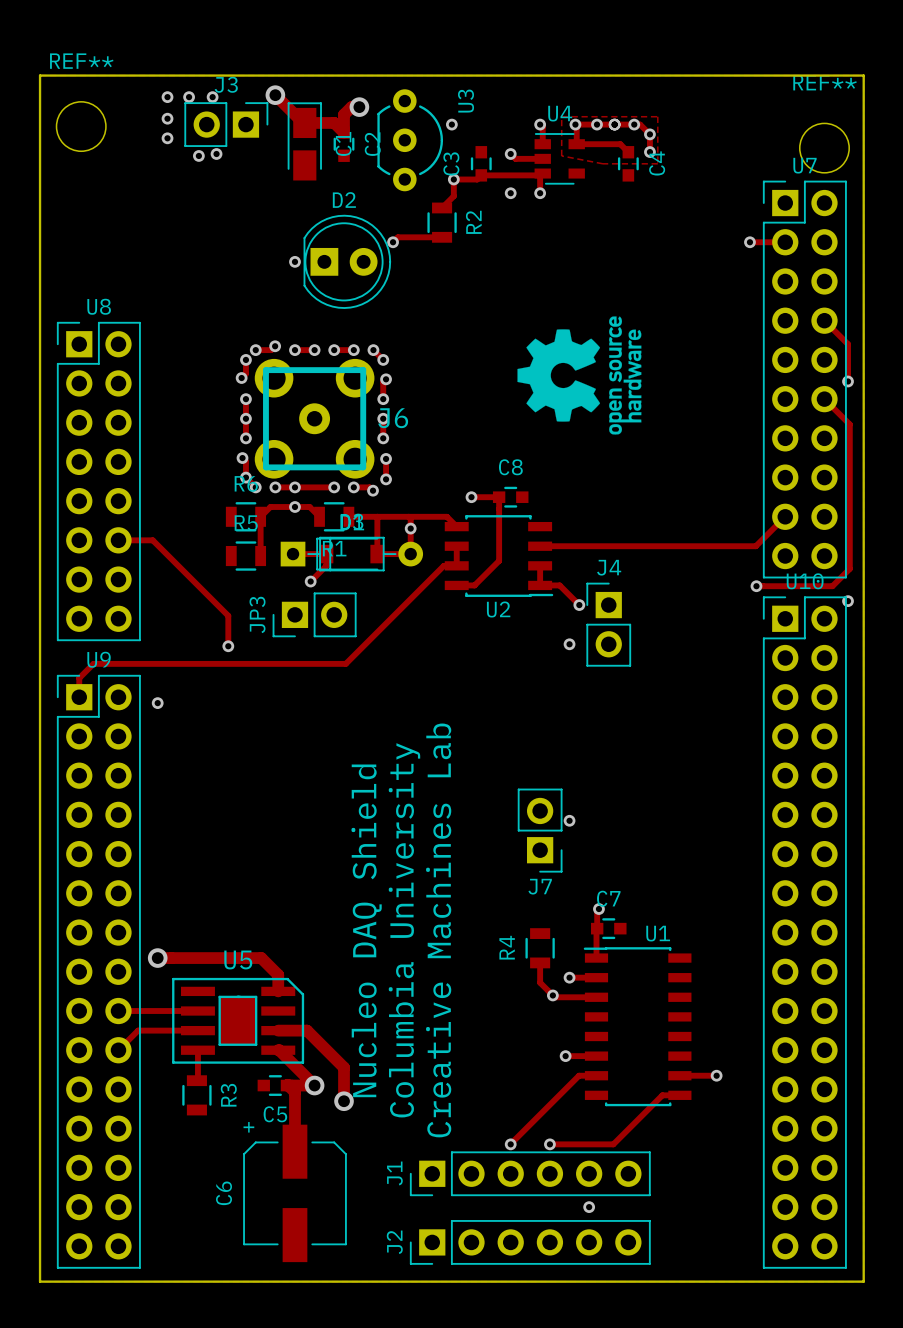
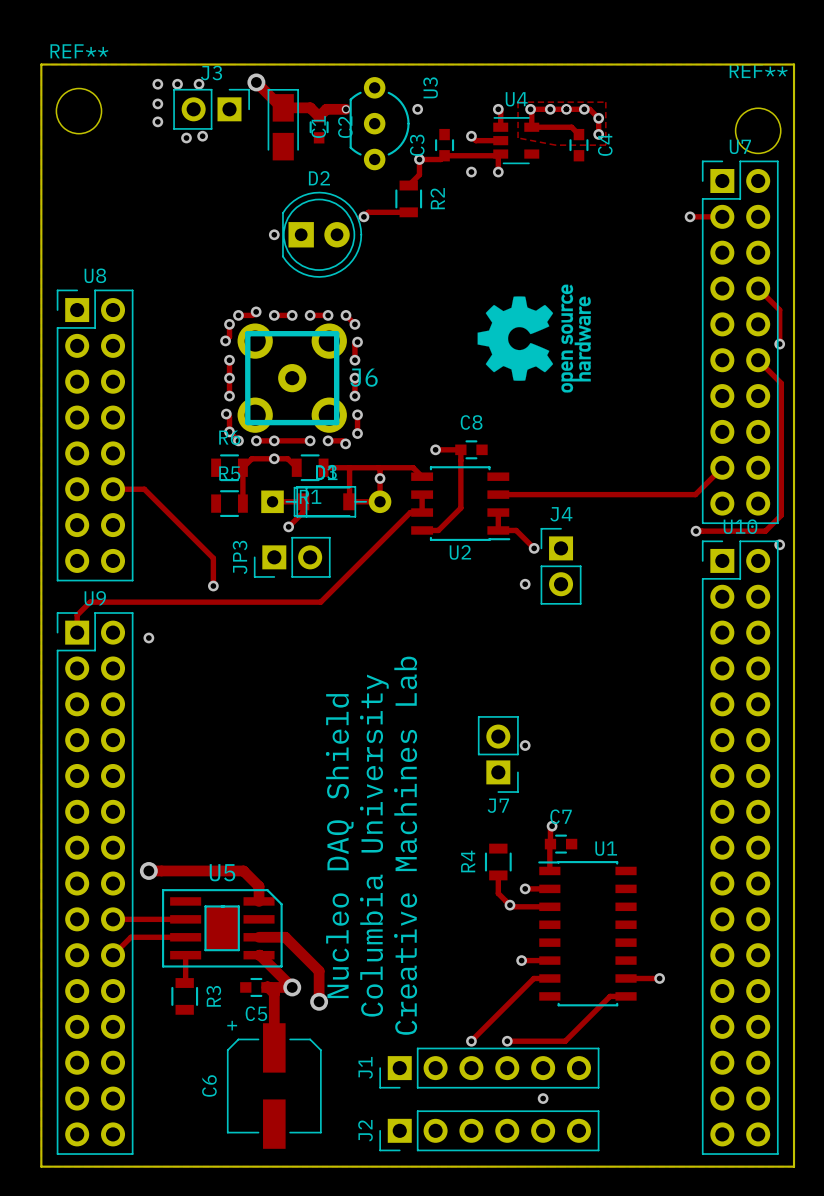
track: (359, 107) (351, 107) (344, 114) (344, 132) -> (345, 109) (326, 109) (319, 116)
via: (359, 107) -> none
via: none -> (345, 109)
via: none -> (566, 109)

